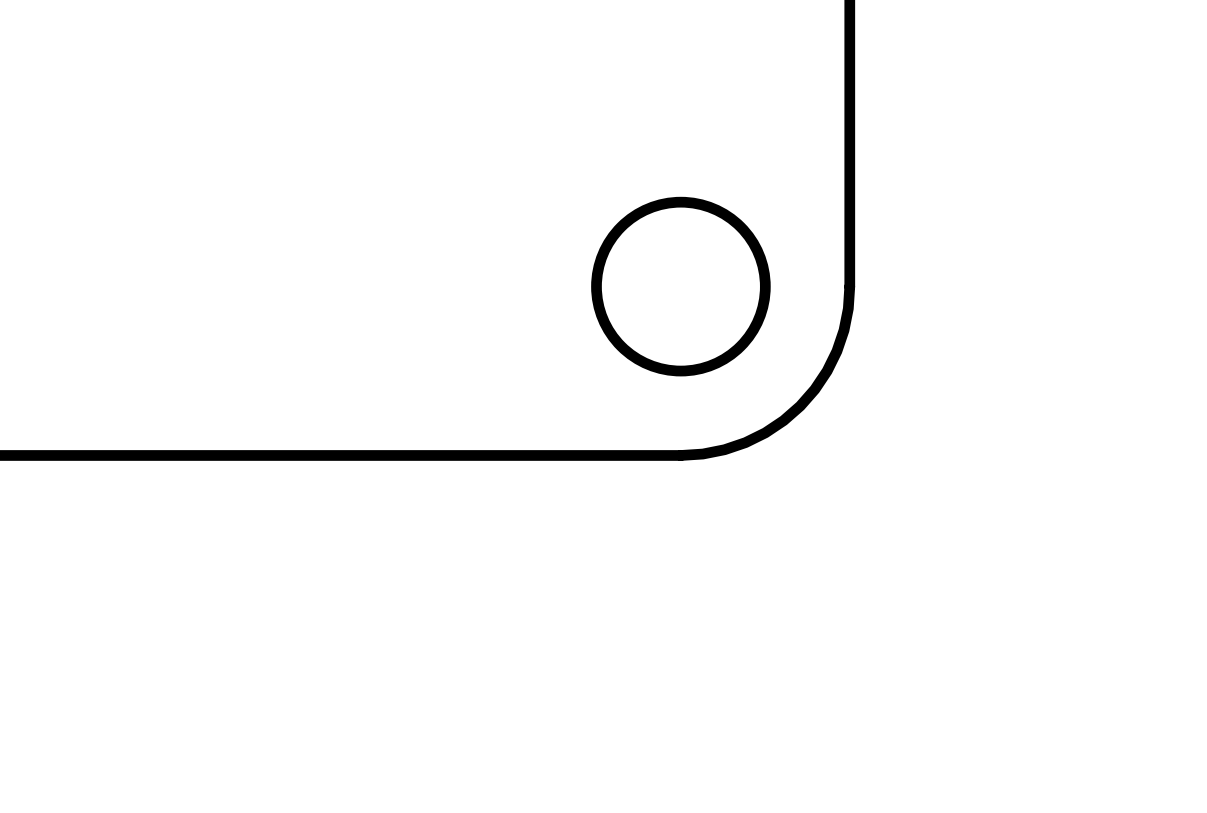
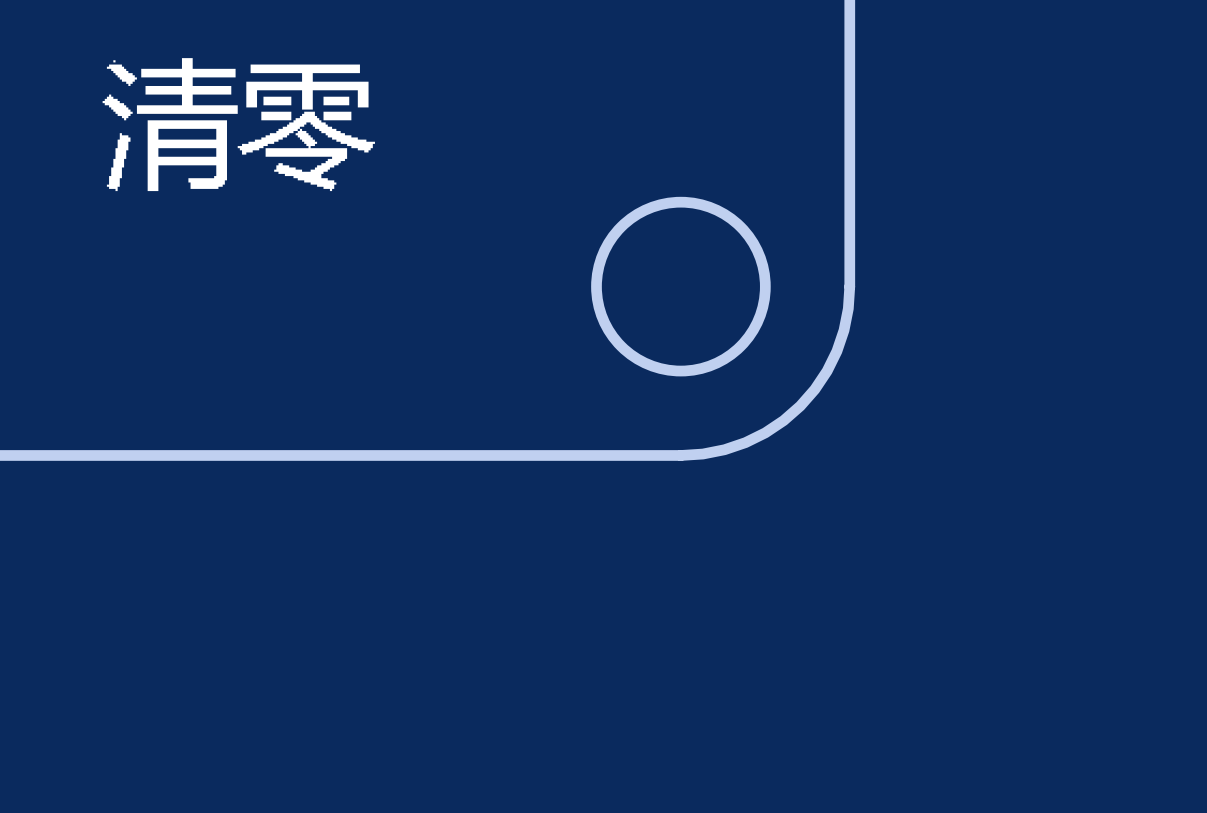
drawing: none -> [102, 58, 375, 192]

